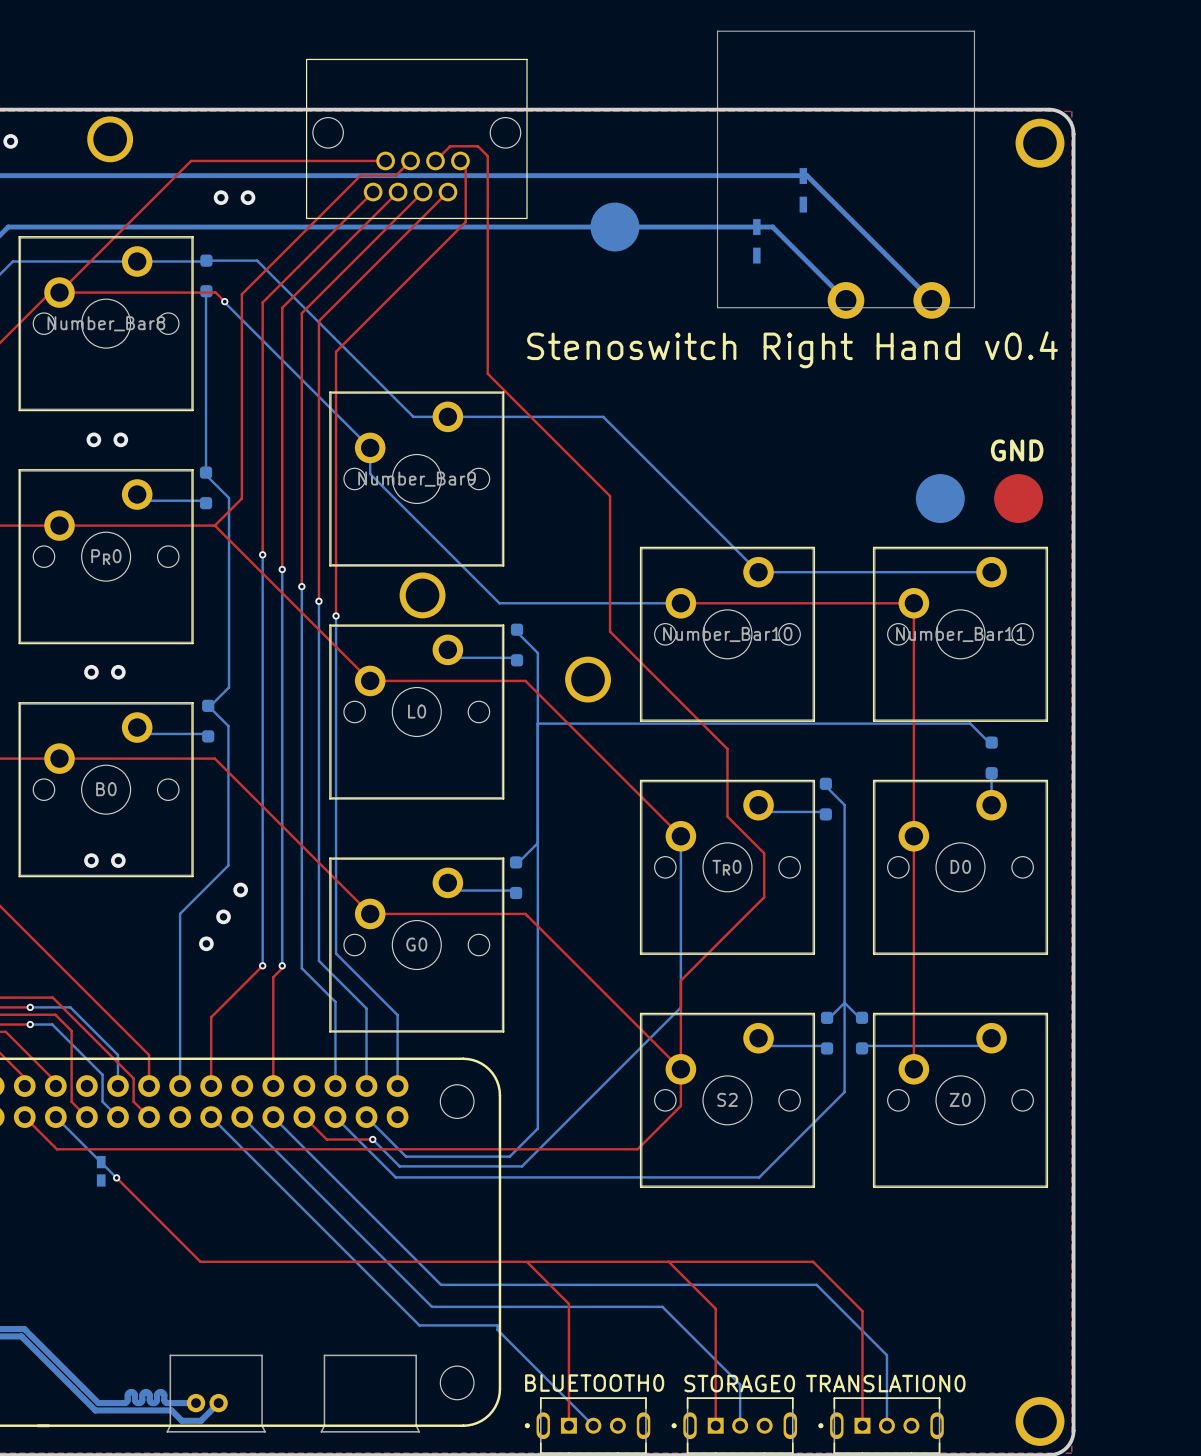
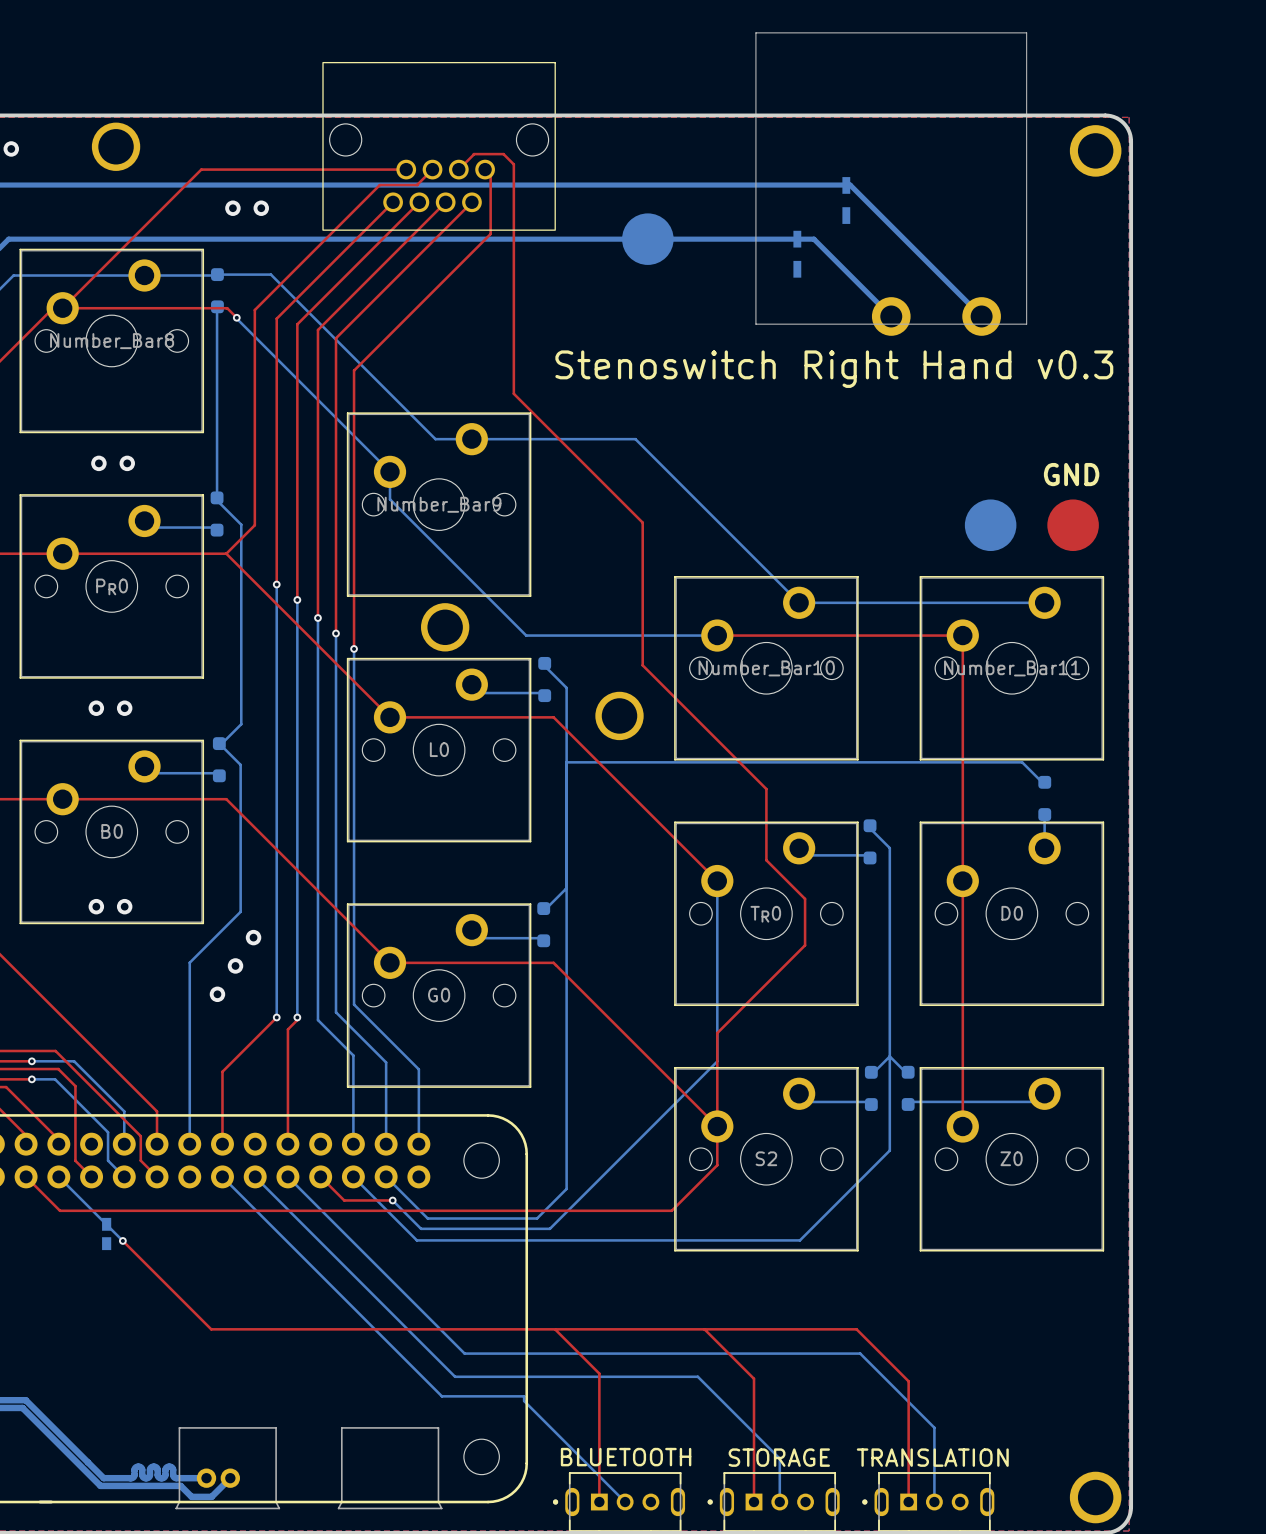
text: Stenoswitch Right Hand v0.4 (792, 349) -> Stenoswitch Right Hand v0.3 (834, 369)
BLUETOOTH0 name: BLUETOOTH0 (594, 1383) -> BLUETOOTH (626, 1457)
STORAGE0 name: STORAGE0 (739, 1383) -> STORAGE (779, 1457)
TRANSLATION0 name: TRANSLATION0 (885, 1383) -> TRANSLATION (932, 1457)

